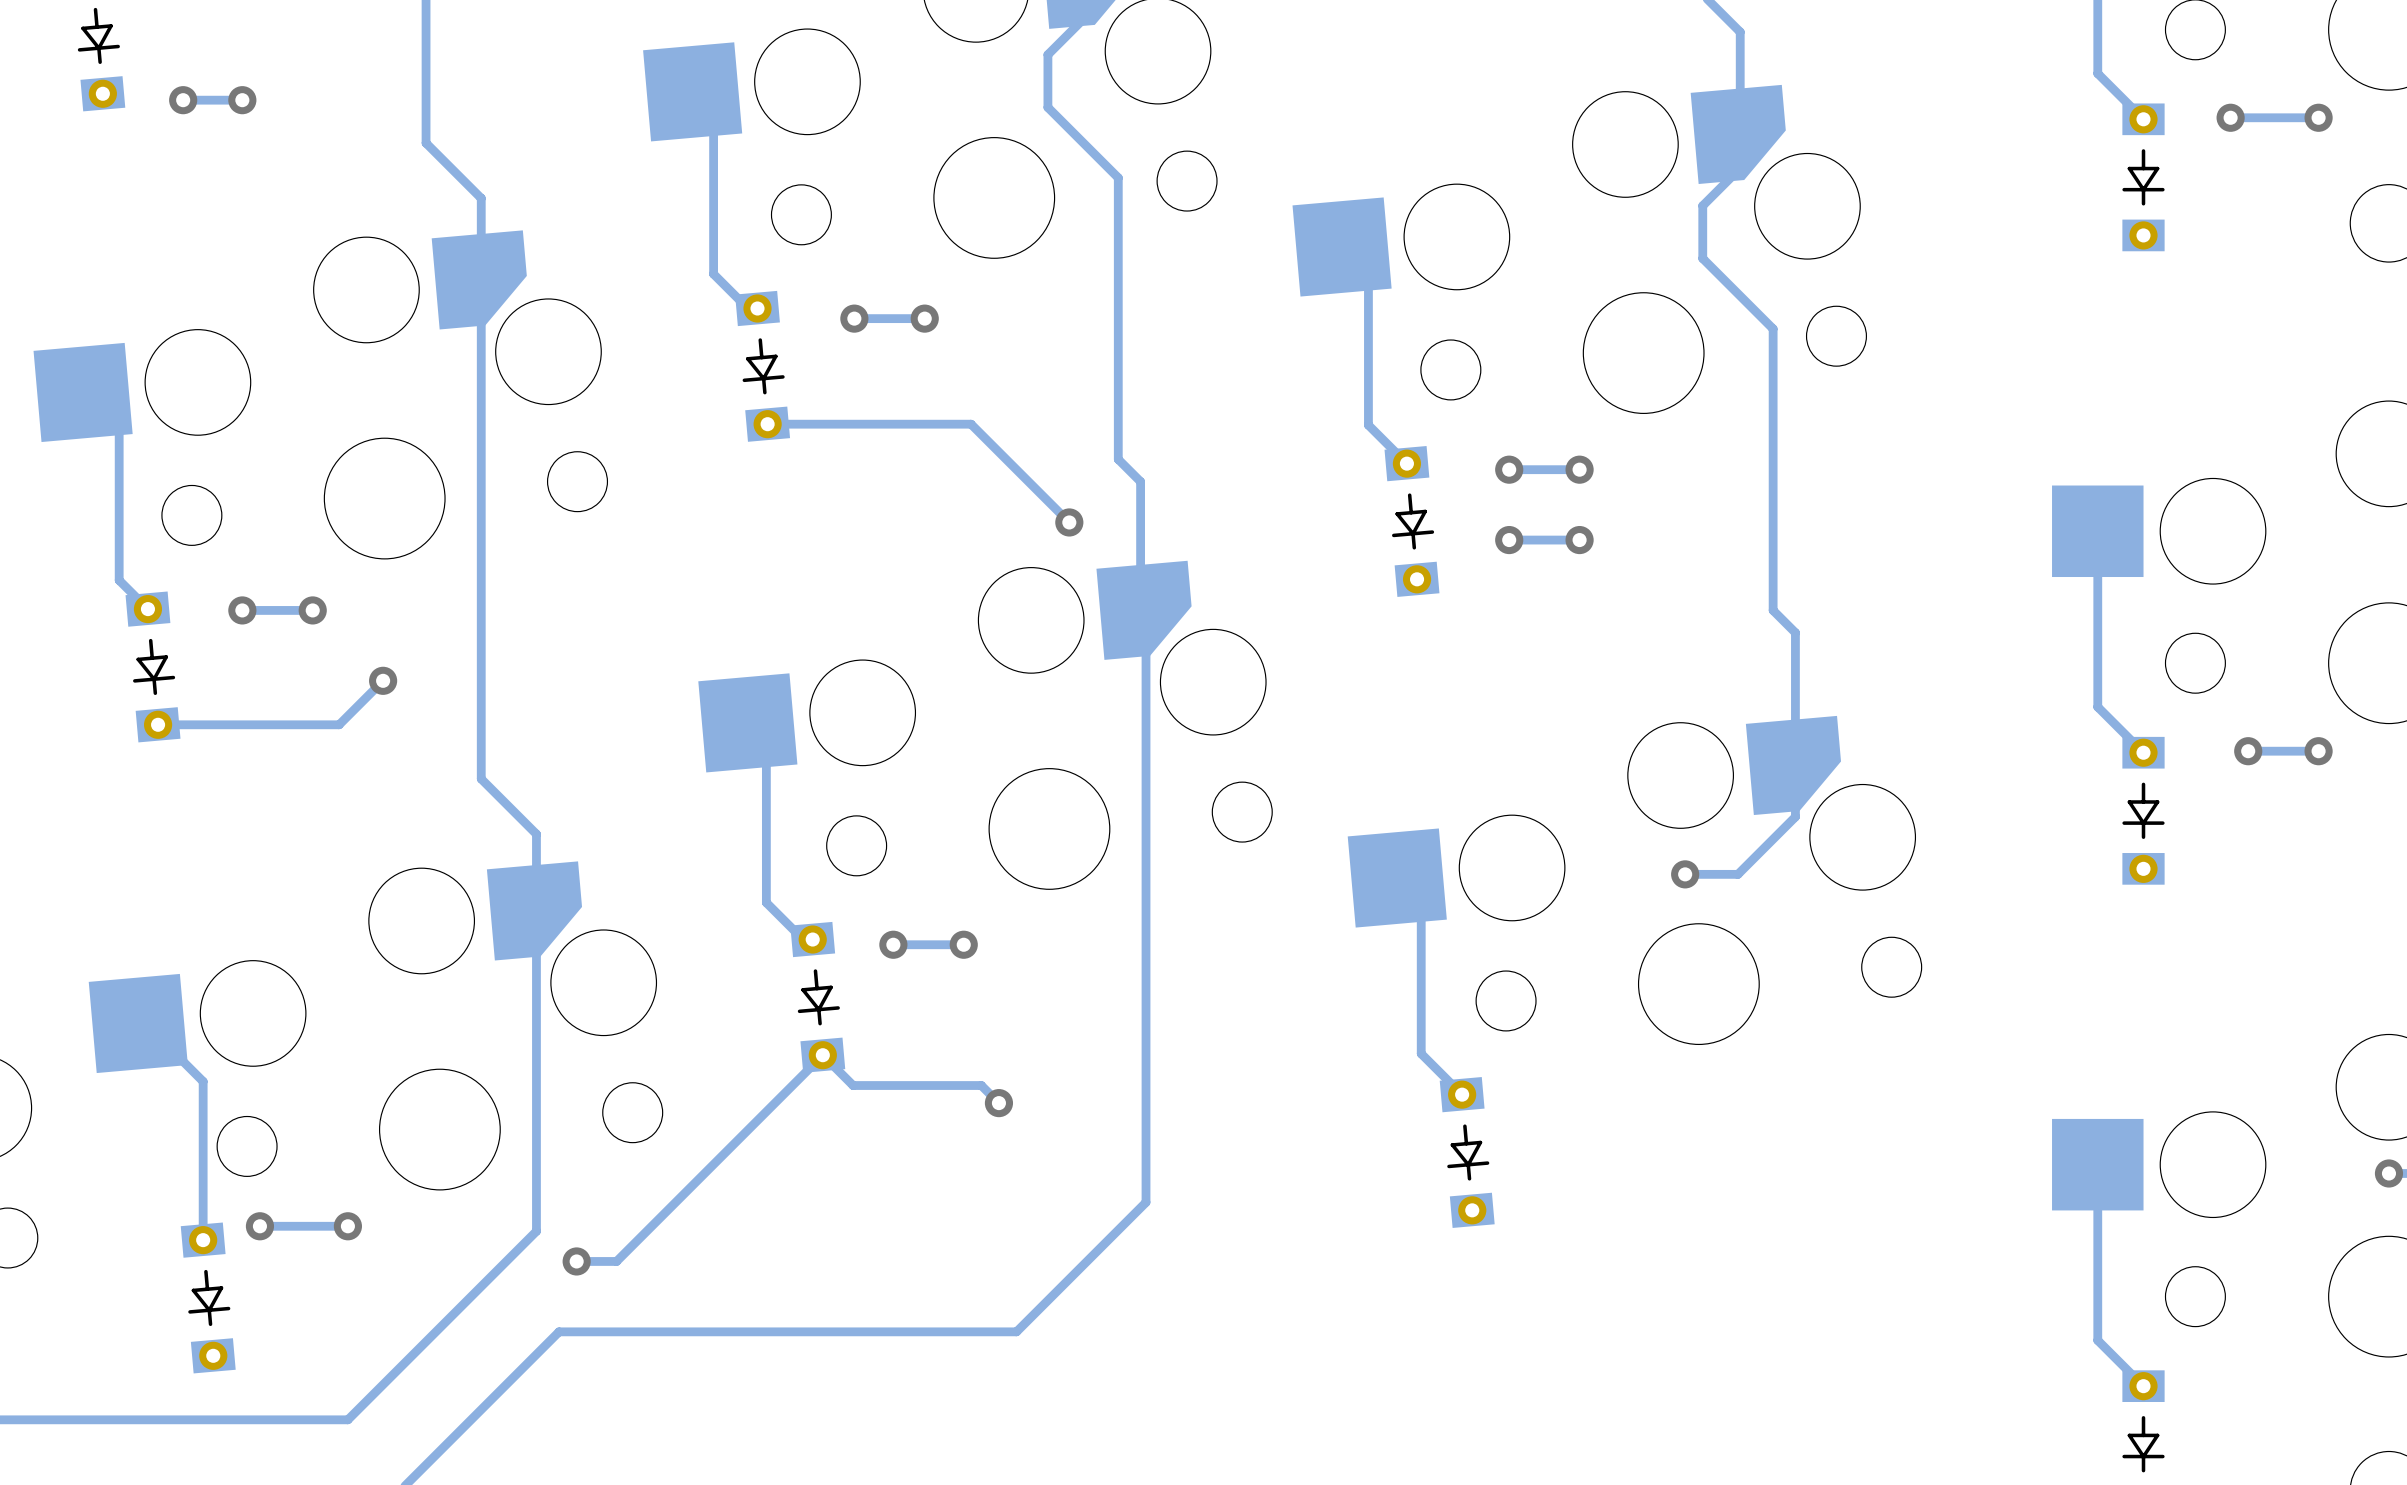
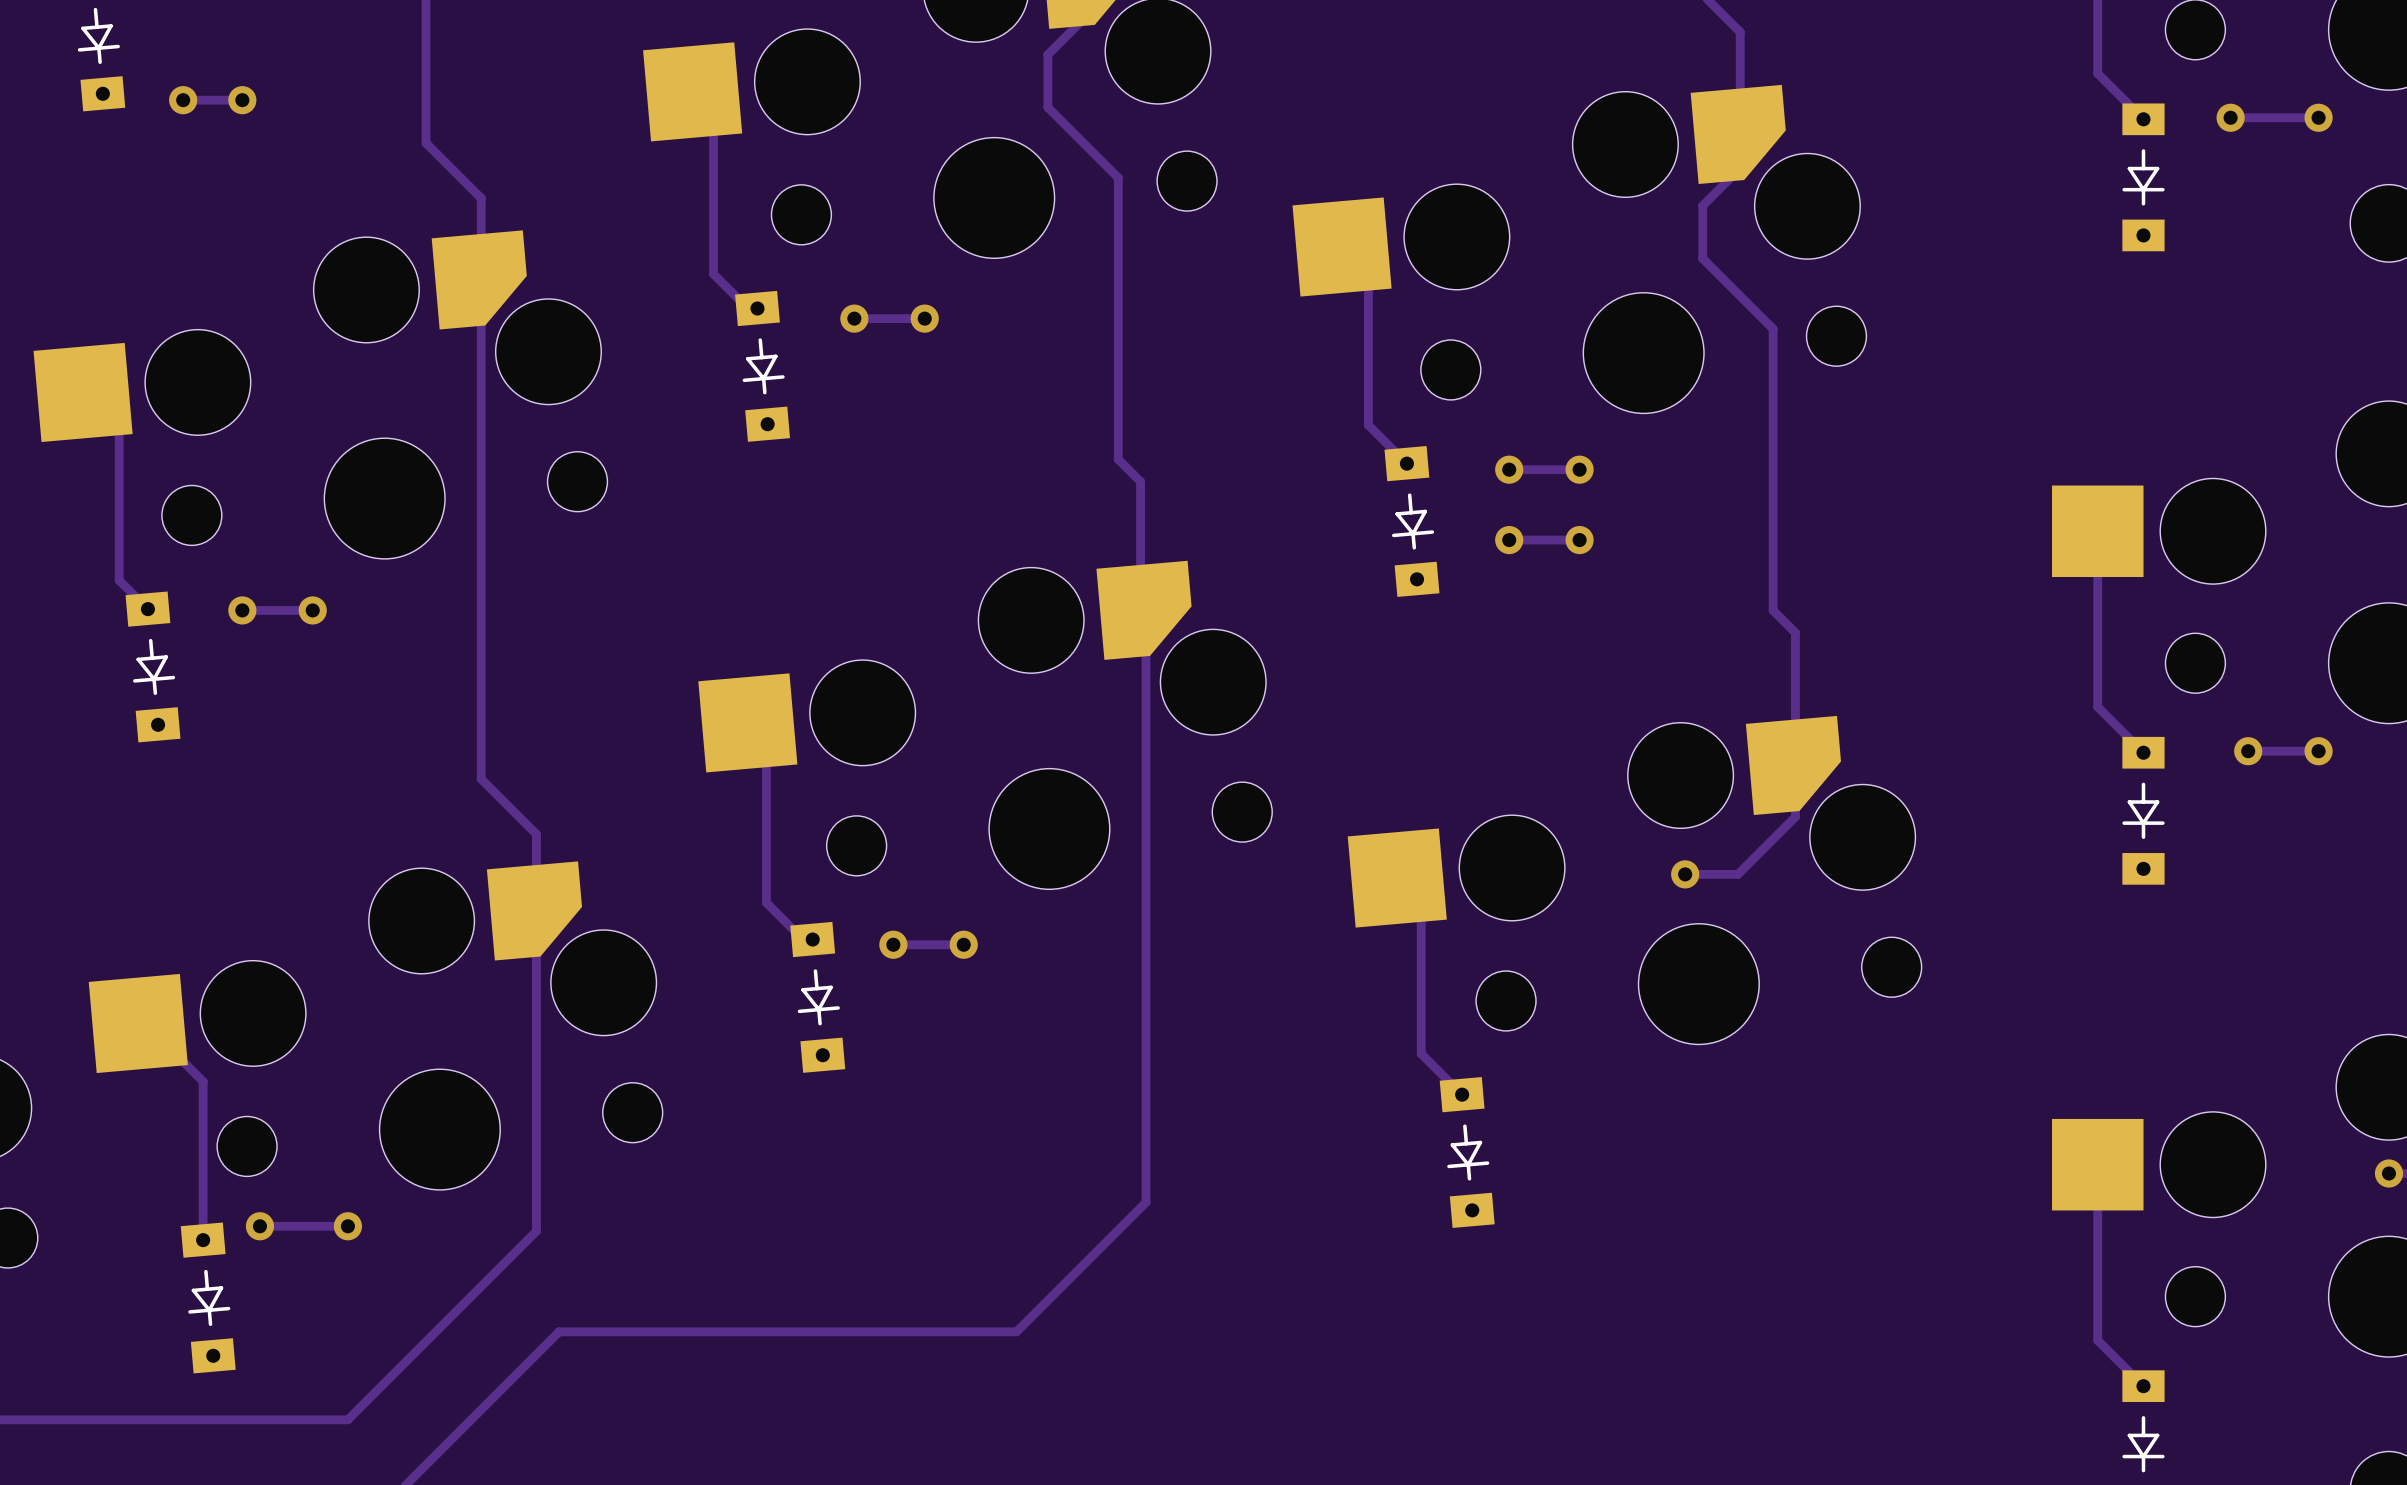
track: (767, 424) (971, 424) (1069, 522) -> none
via: (1069, 522) -> none
track: (383, 680) (339, 724) (158, 724) -> none
via: (383, 680) -> none
track: (998, 1103) (981, 1085) (853, 1085) (822, 1055) (616, 1261) (576, 1261) -> none
via: (998, 1103) -> none
via: (576, 1261) -> none

